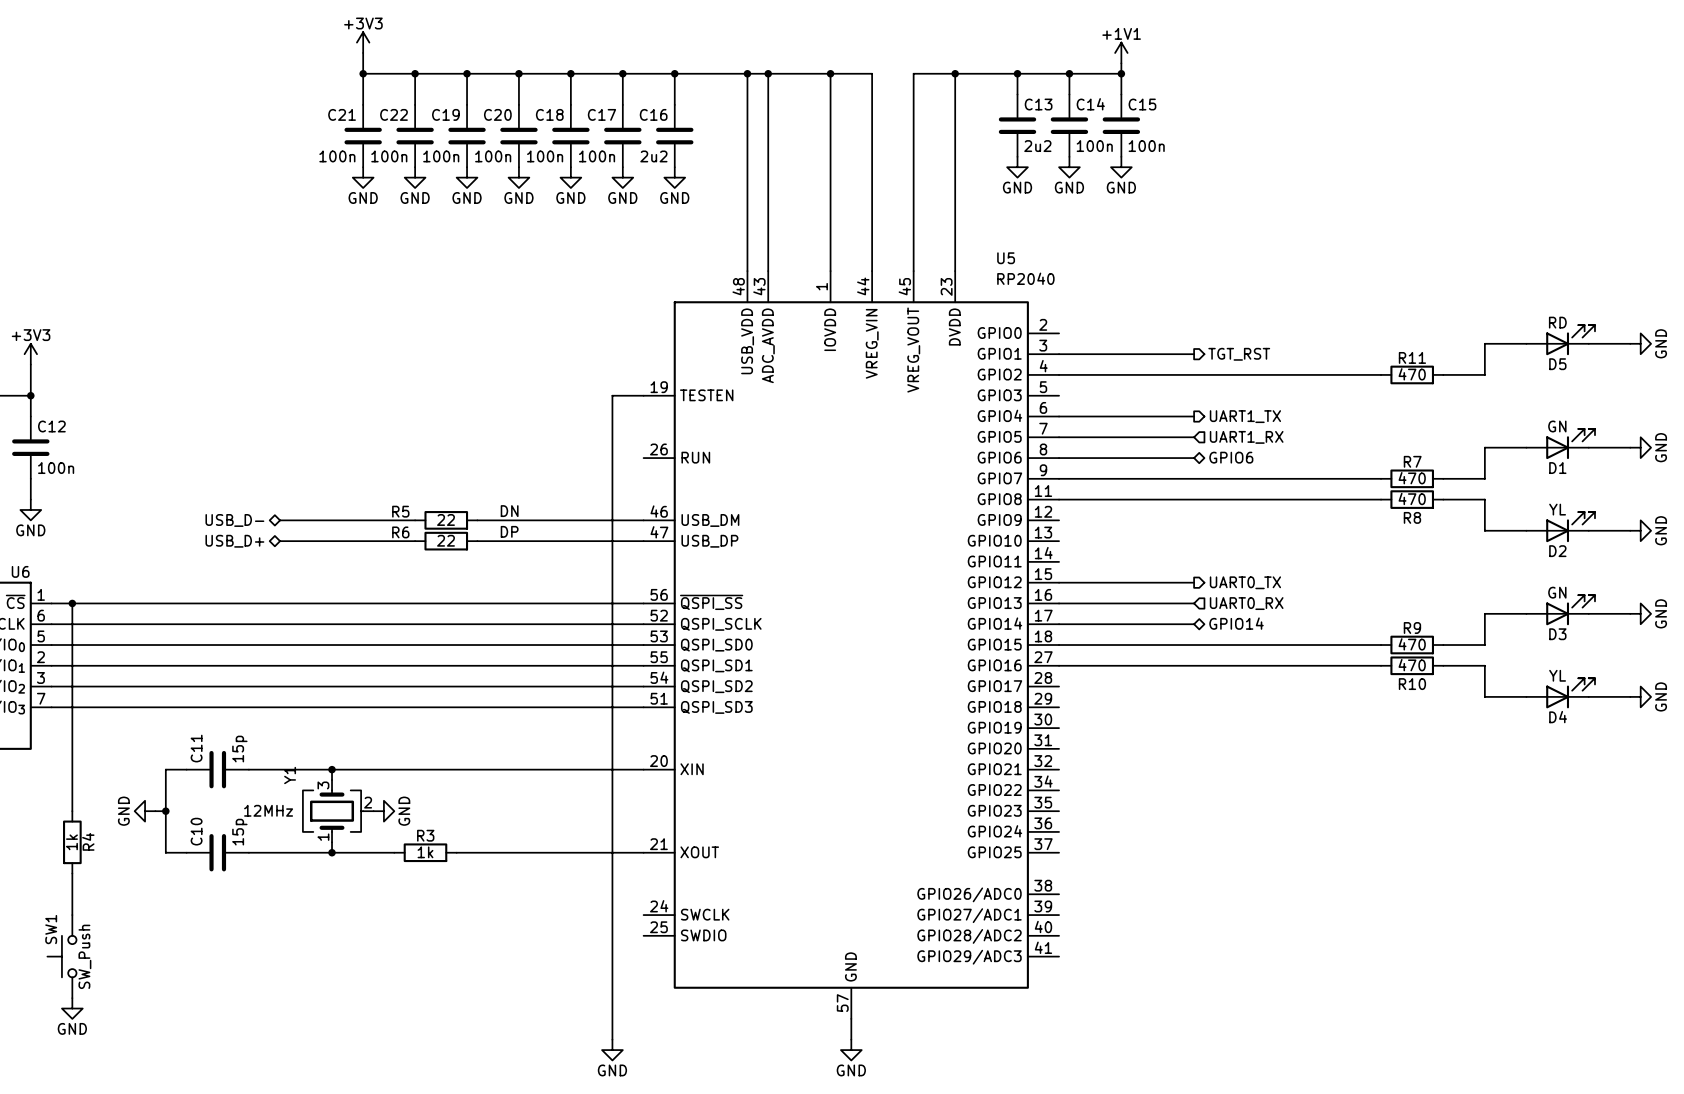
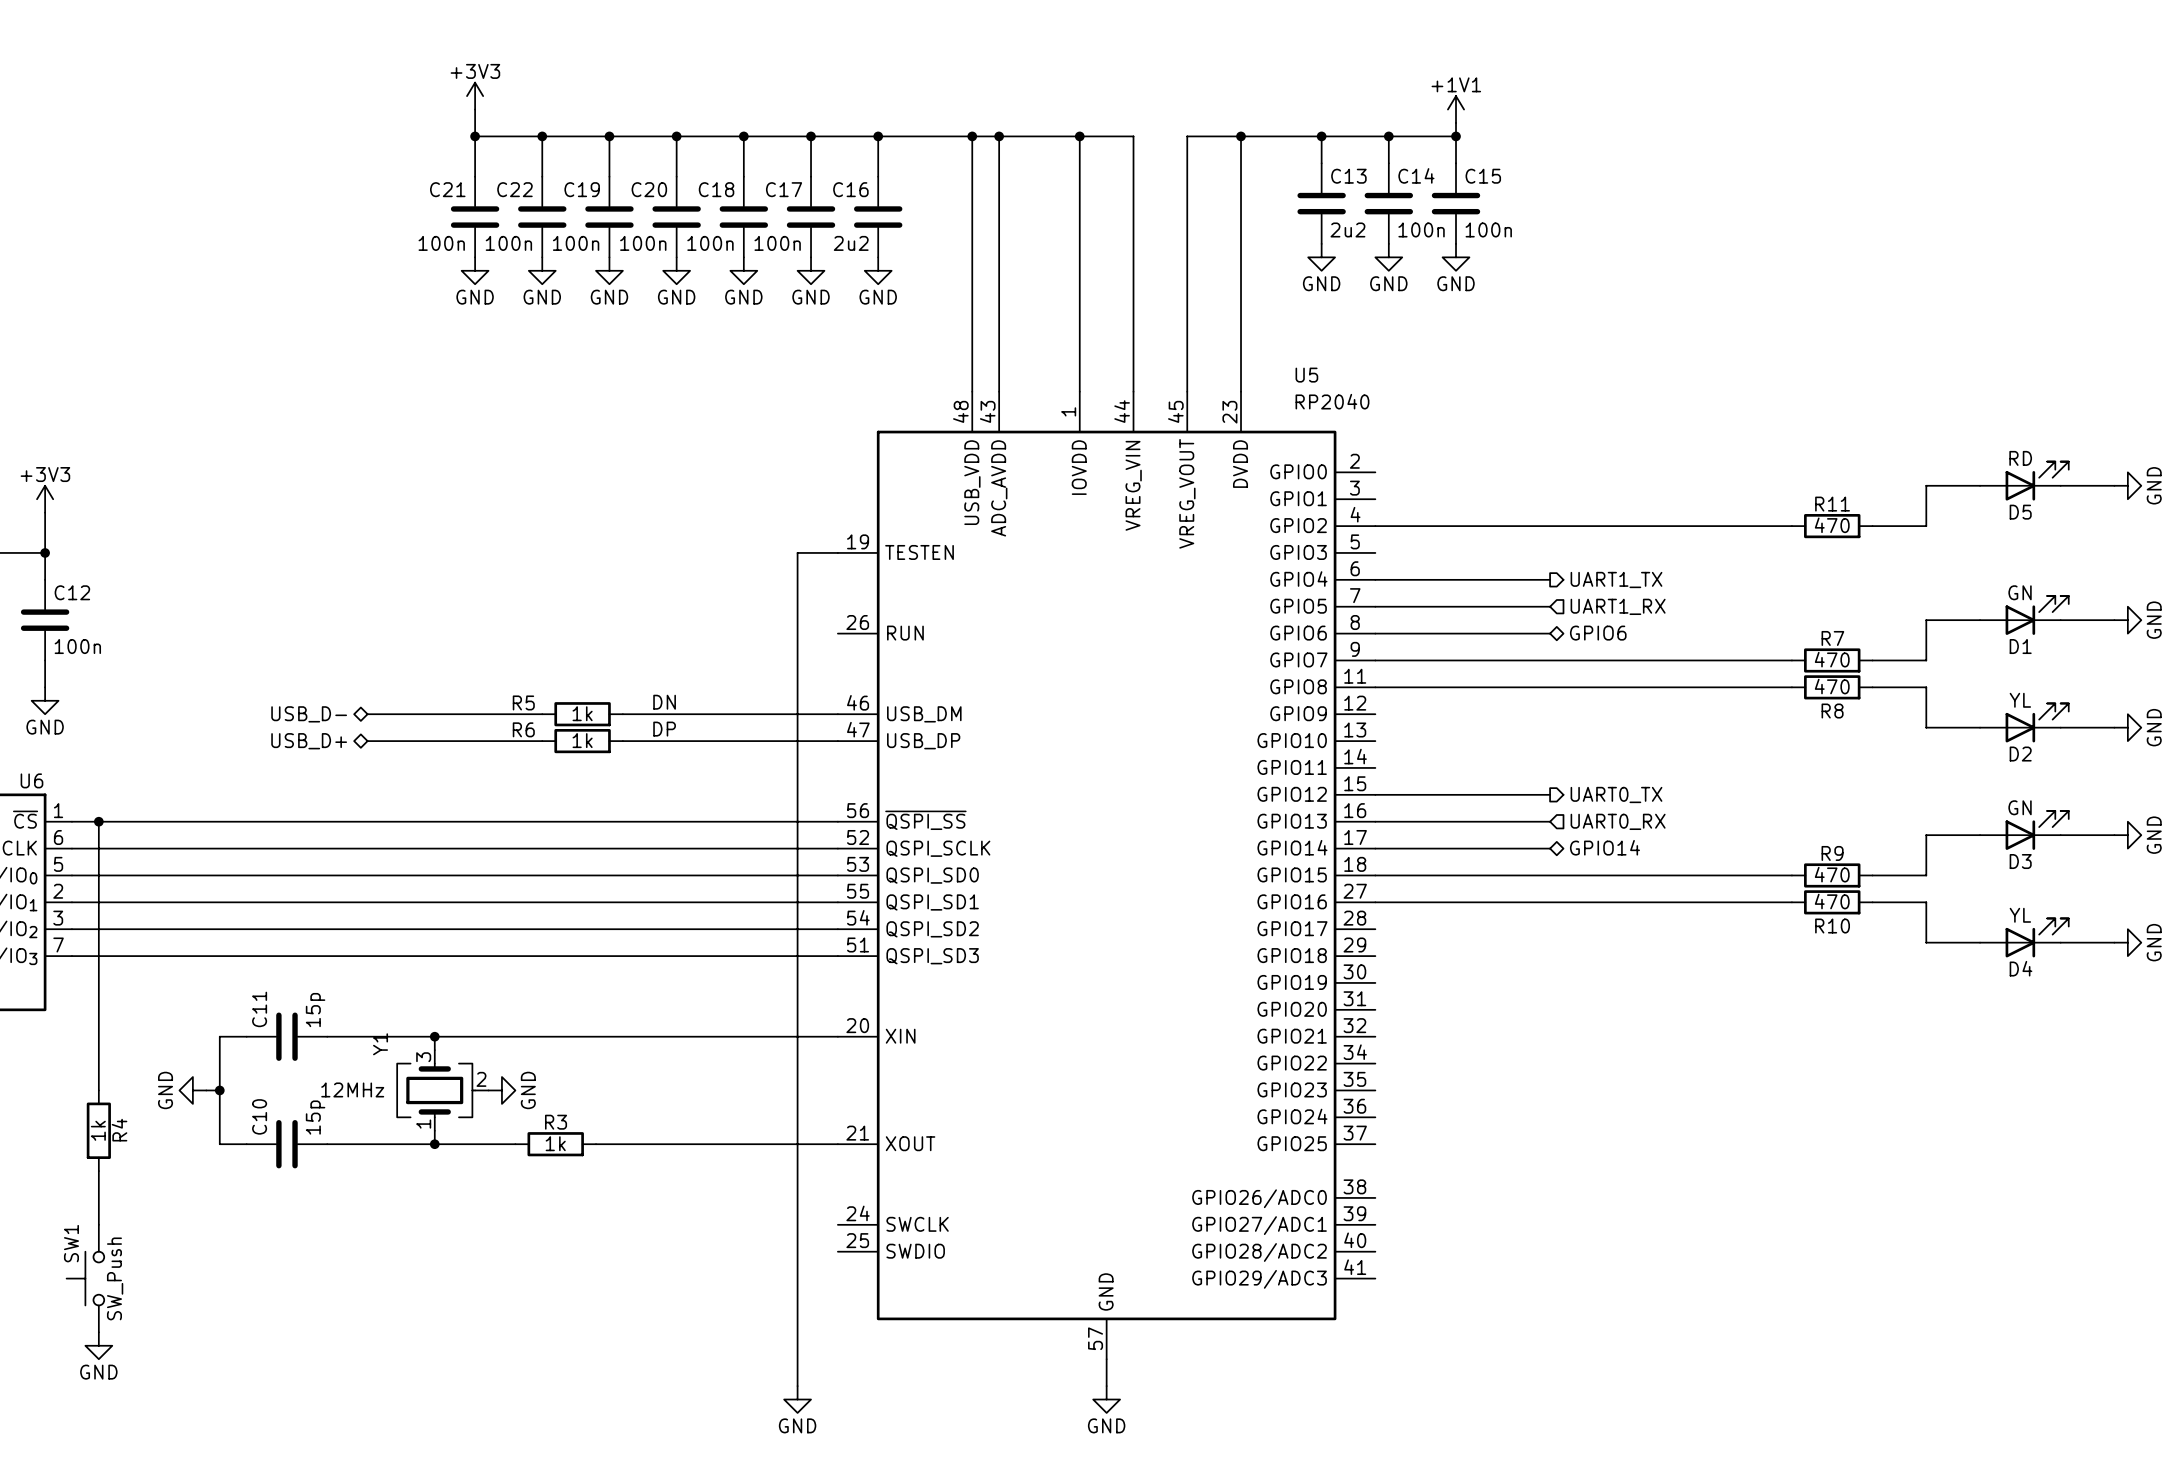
wire: (1059, 354) (1194, 354) -> none
hierarchical label: TGT_RST (1239, 354) -> none
R5 value: 22 (446, 519) -> 1k (582, 713)
R6 value: 22 (446, 540) -> 1k (582, 740)

